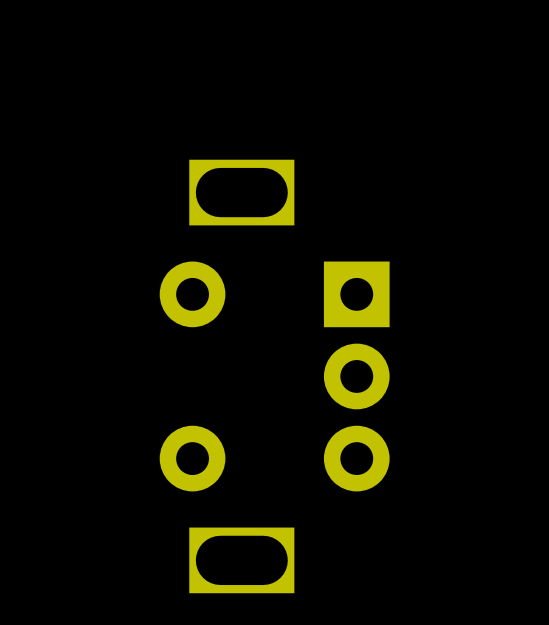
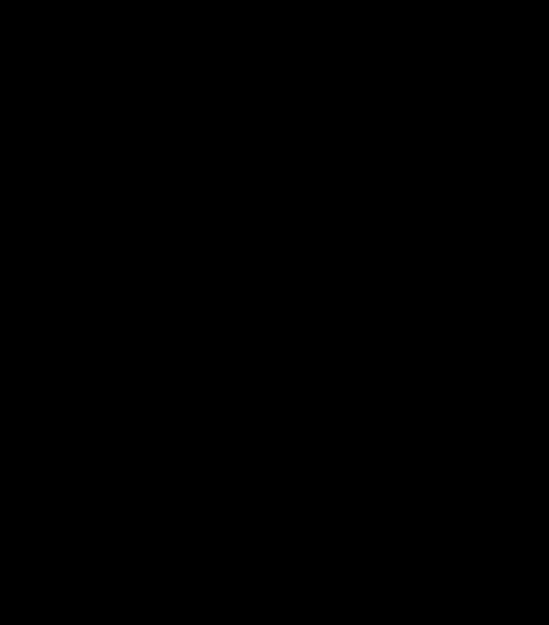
part: (274, 376) -> none

